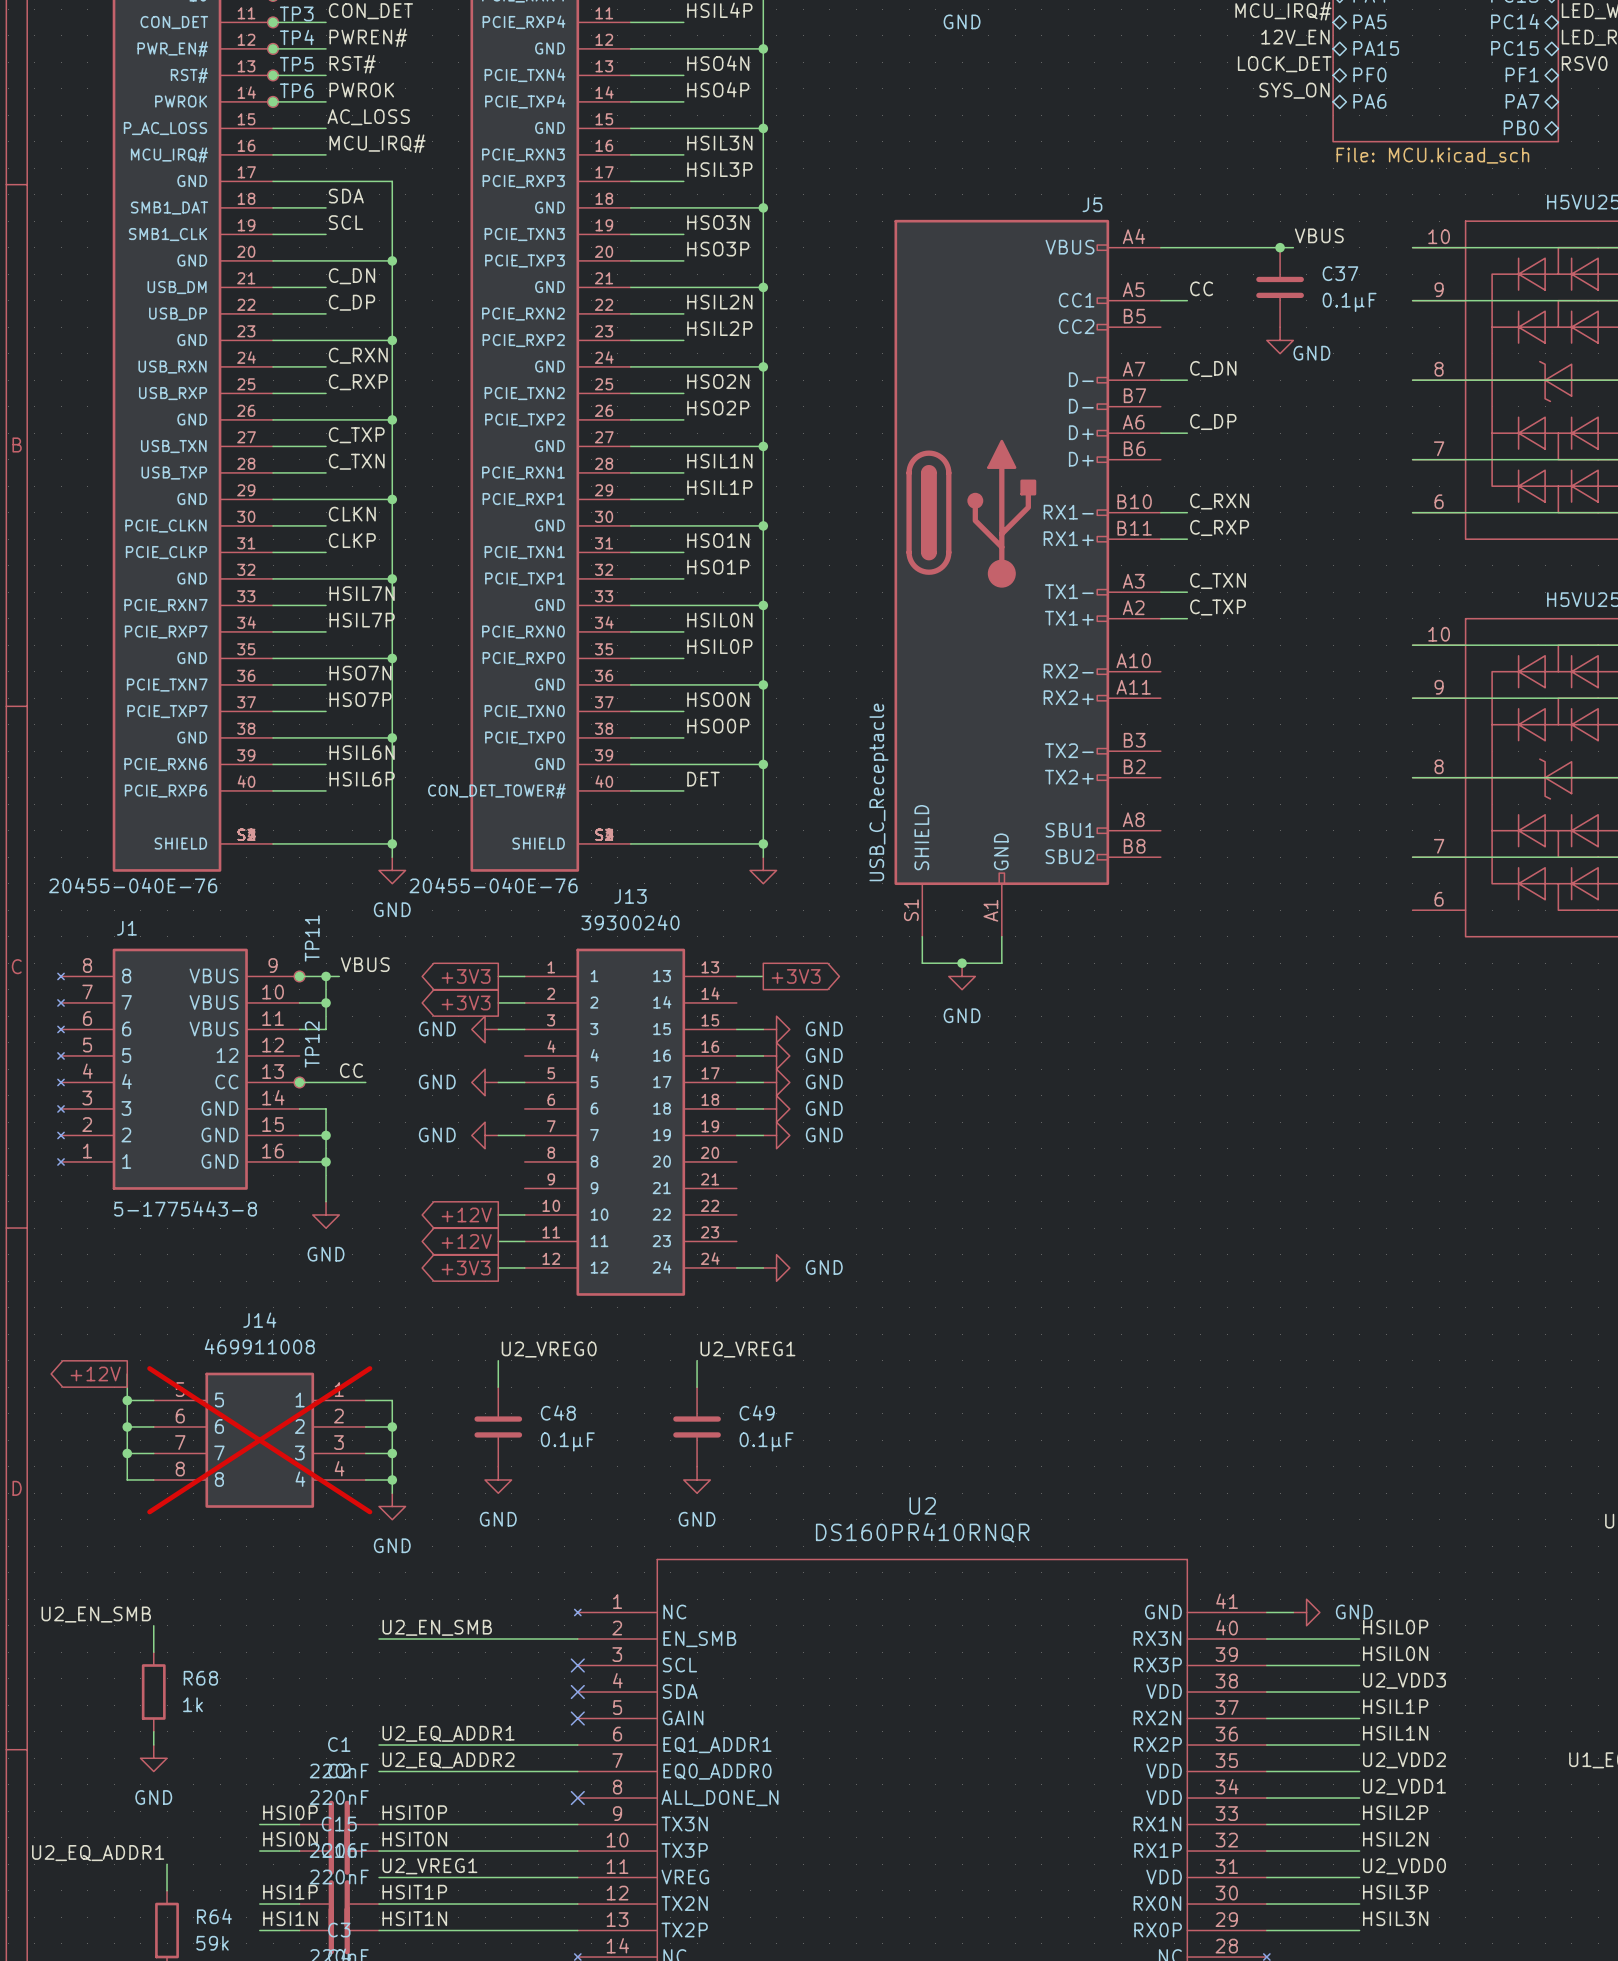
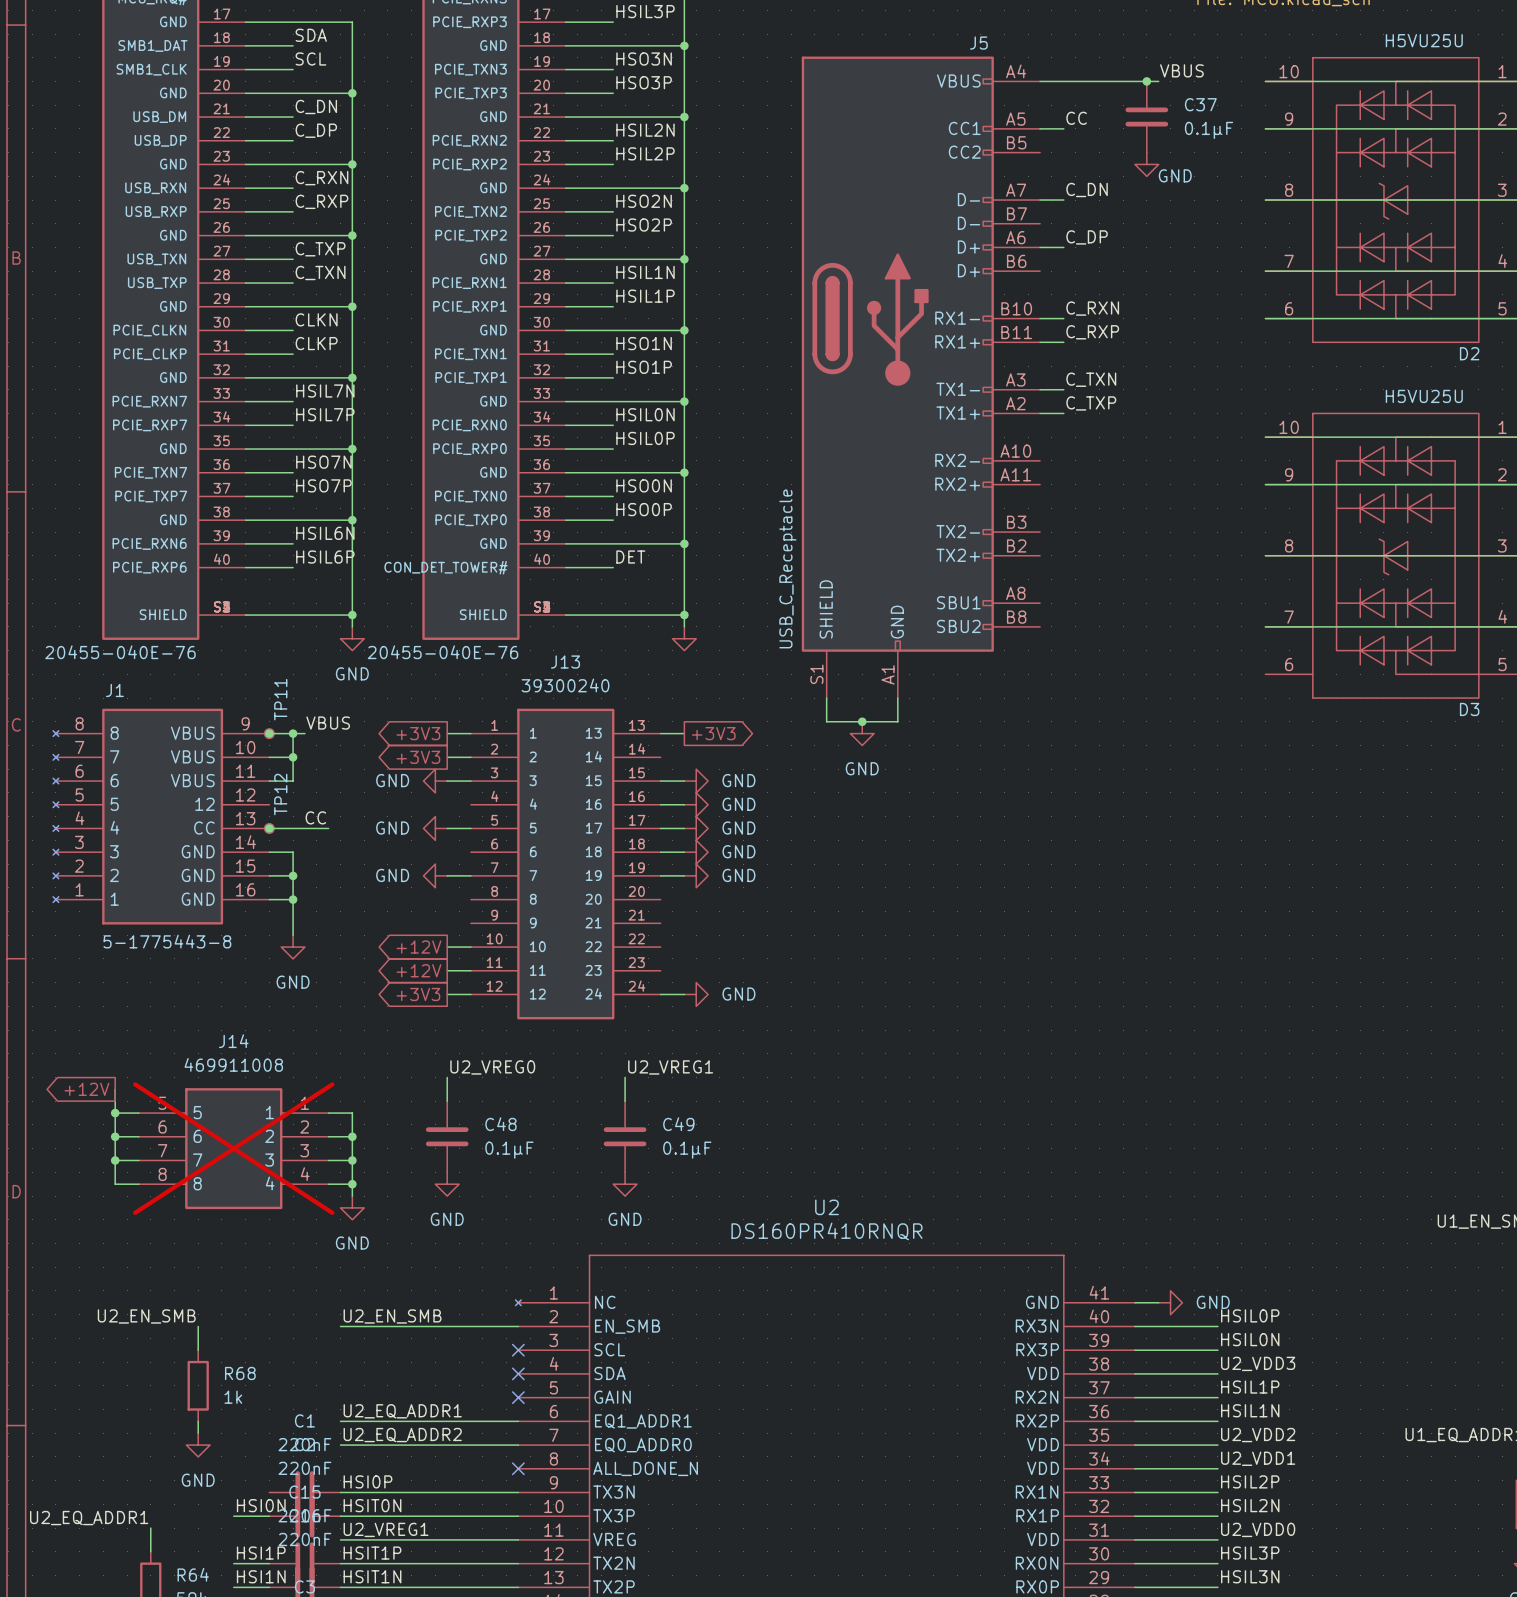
label position: U2_EN_SMB (96, 1614) -> U2_EN_SMB (146, 1316)
wire: (153, 1625) (153, 1652) -> (198, 1326) (198, 1350)
R68 position: (153, 1692) -> (198, 1385)
wire: (153, 1731) (153, 1745) -> (198, 1421) (198, 1433)
power symbol position: GND (153, 1758) -> GND (198, 1445)
label: HSI0P (290, 1812) -> none
label: HSIT0P (414, 1812) -> HSI0P (367, 1481)
wire: (259, 1824) (299, 1824) -> none

